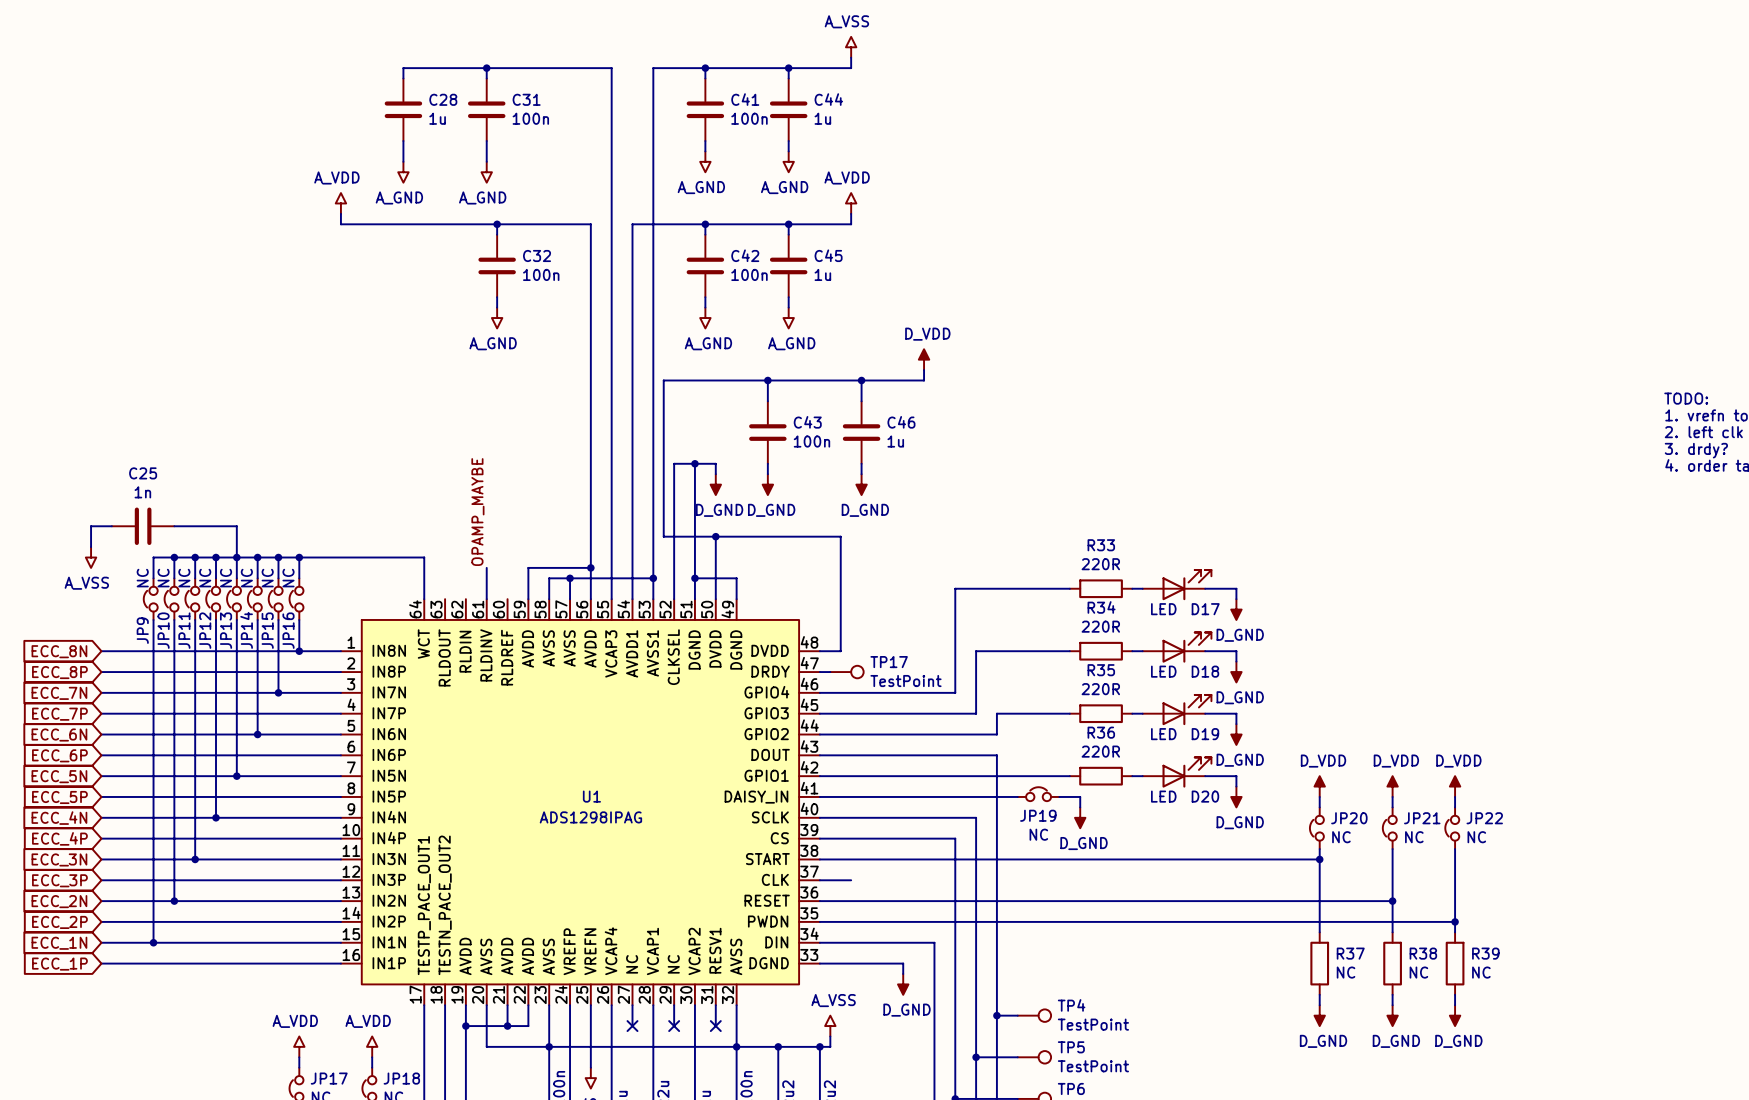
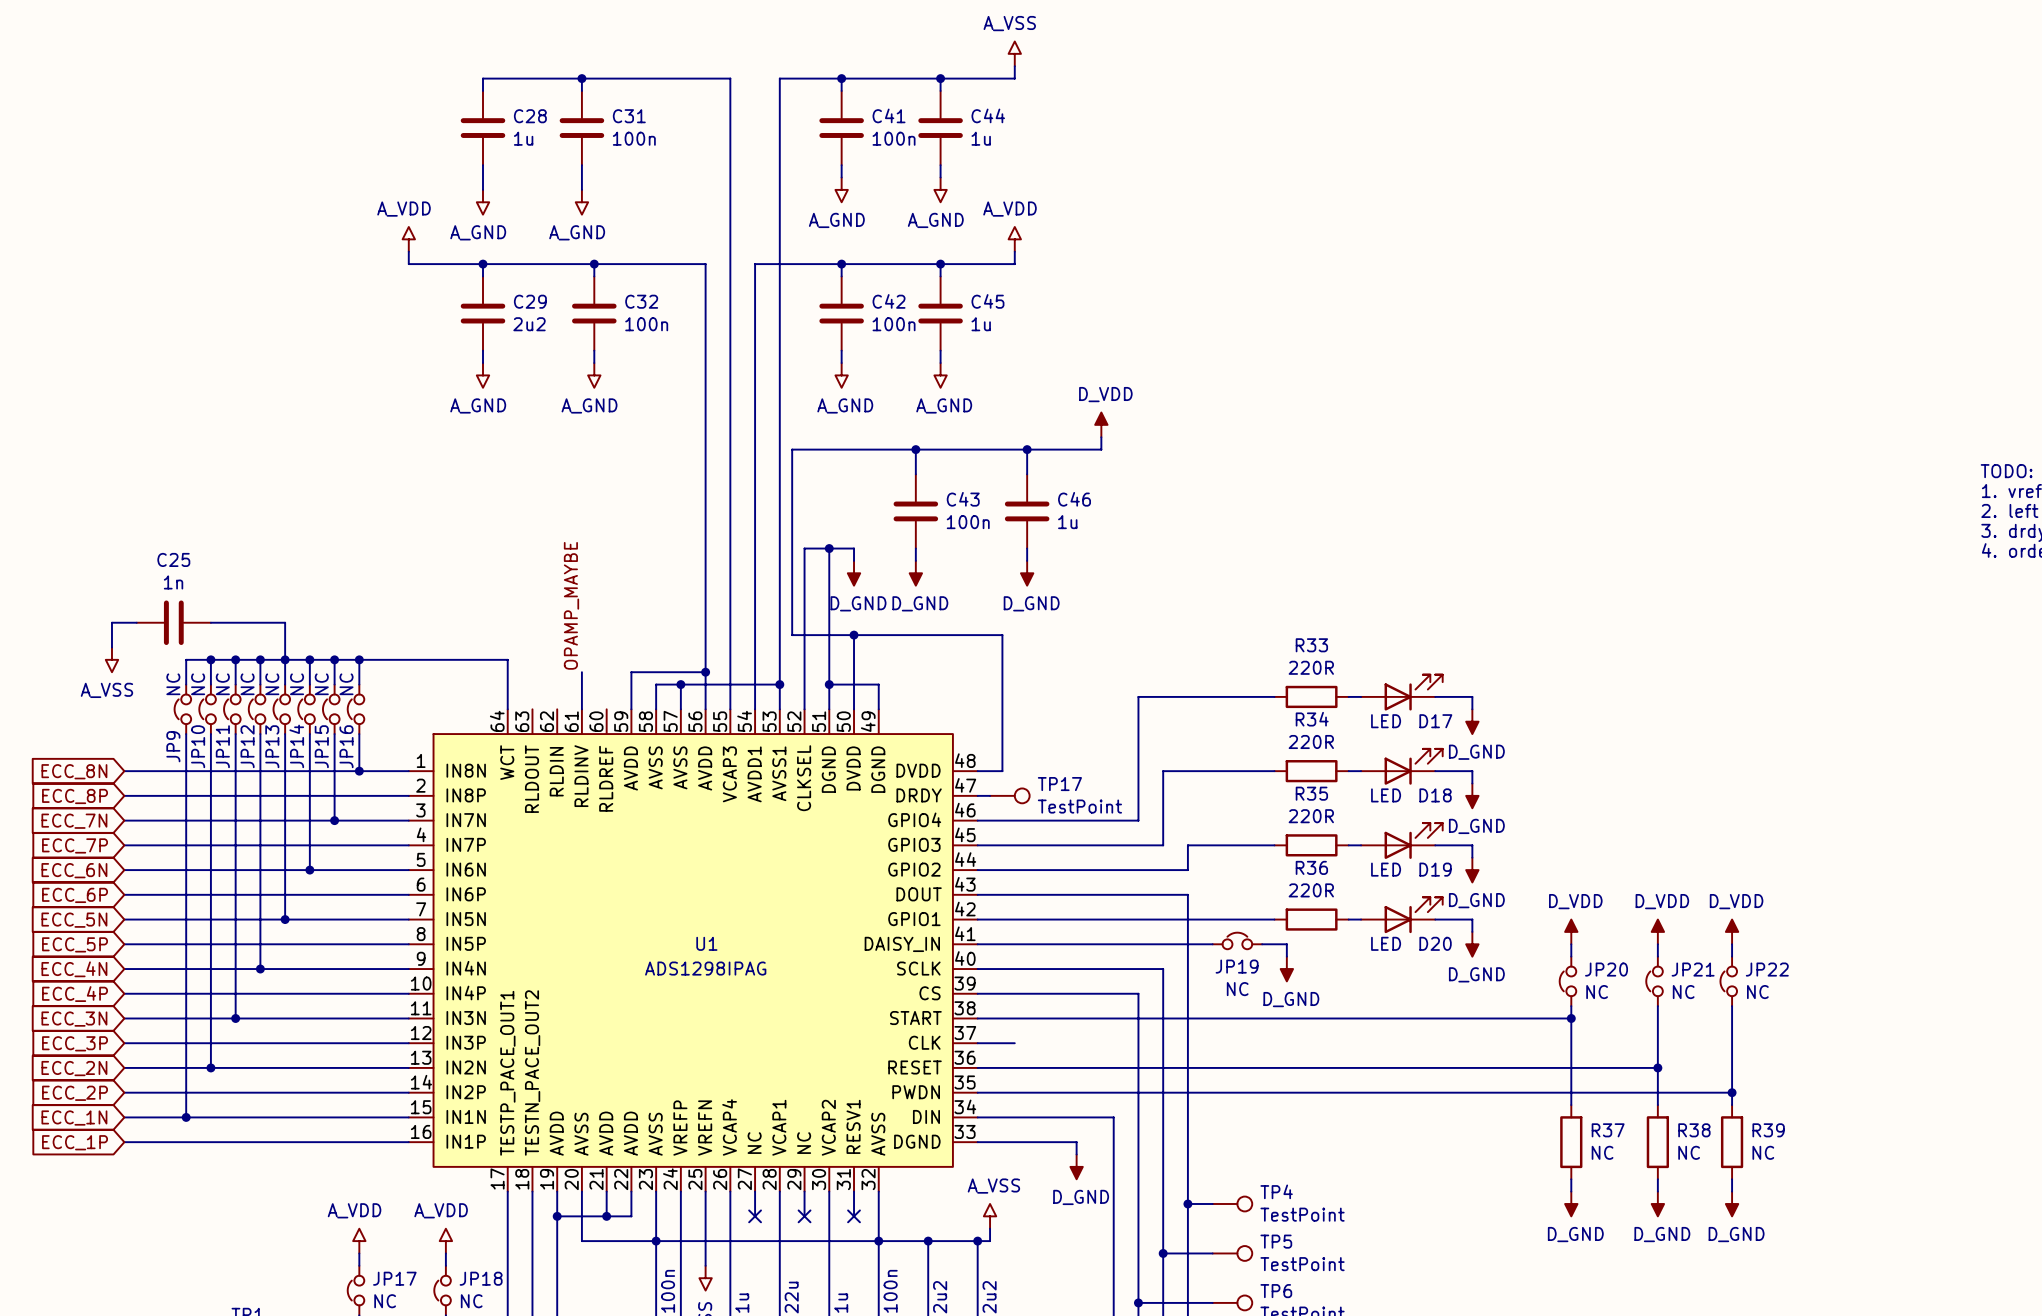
wire: none -> (483, 264) (483, 276)
junction: none -> (483, 264)
C29: none -> 2u2 (483, 313)
wire: none -> (483, 350) (483, 363)
power symbol: none -> A_GND (483, 375)

